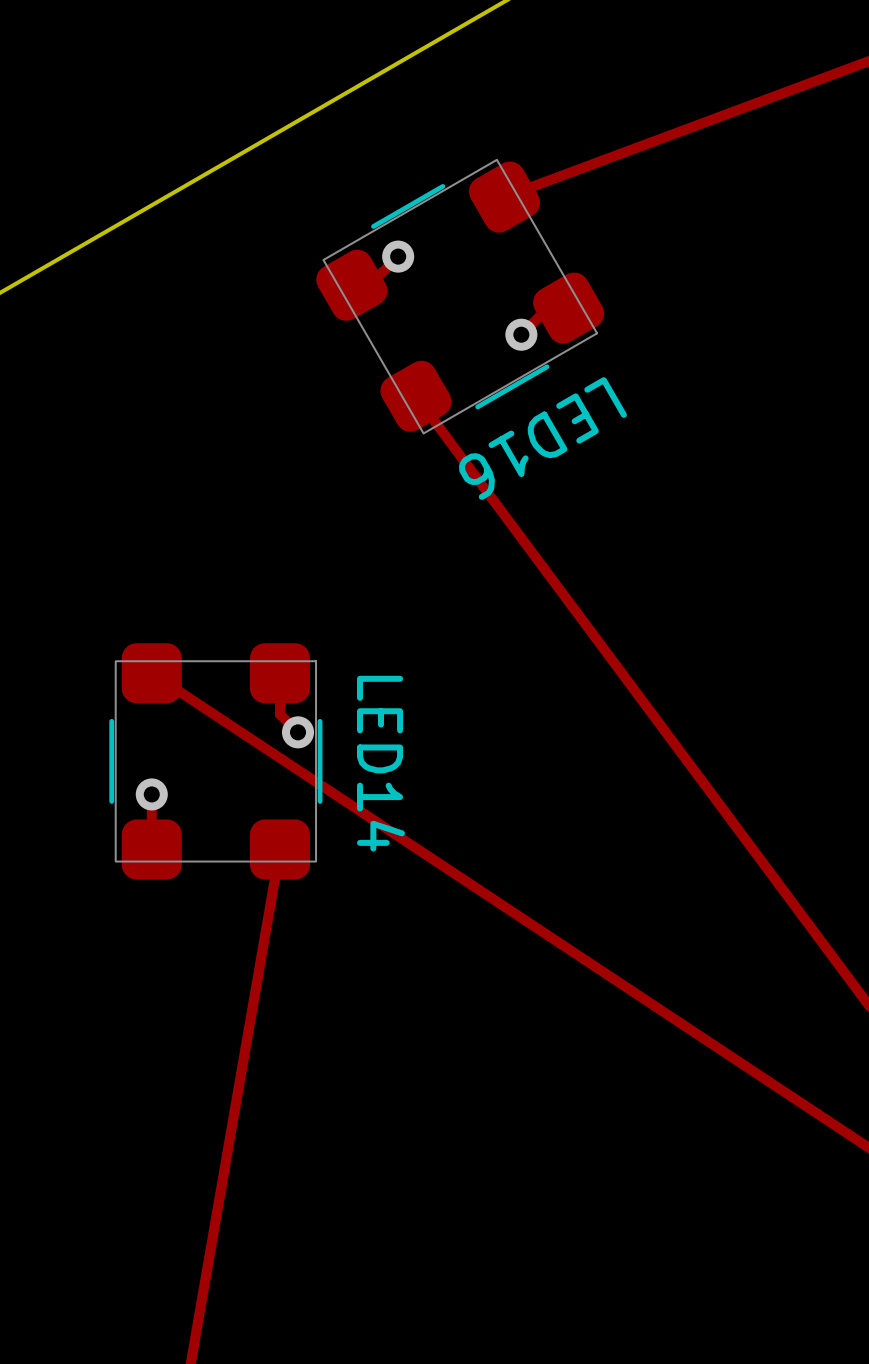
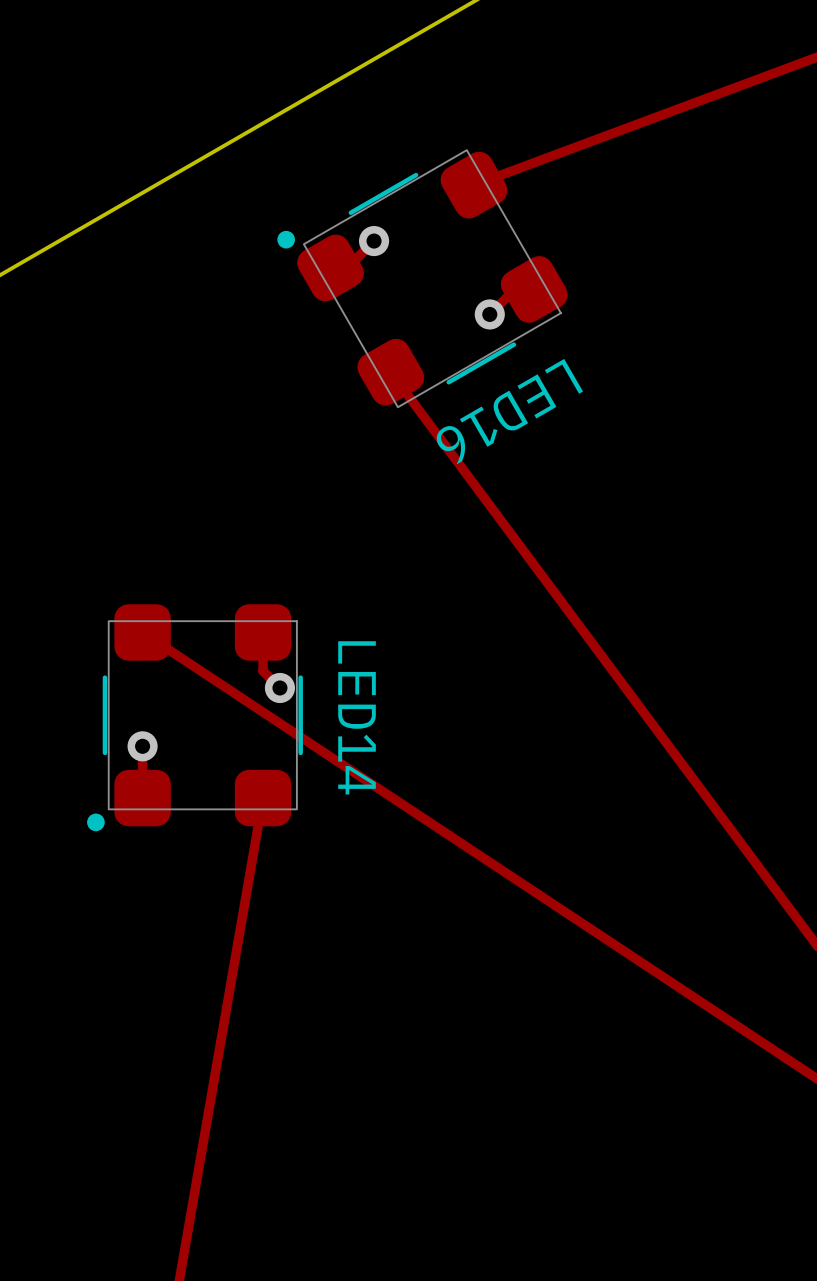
LED16 footprint: [316, 158, 605, 435] -> [277, 149, 568, 409]
LED14 footprint: [109, 643, 323, 880] -> [87, 604, 303, 832]

